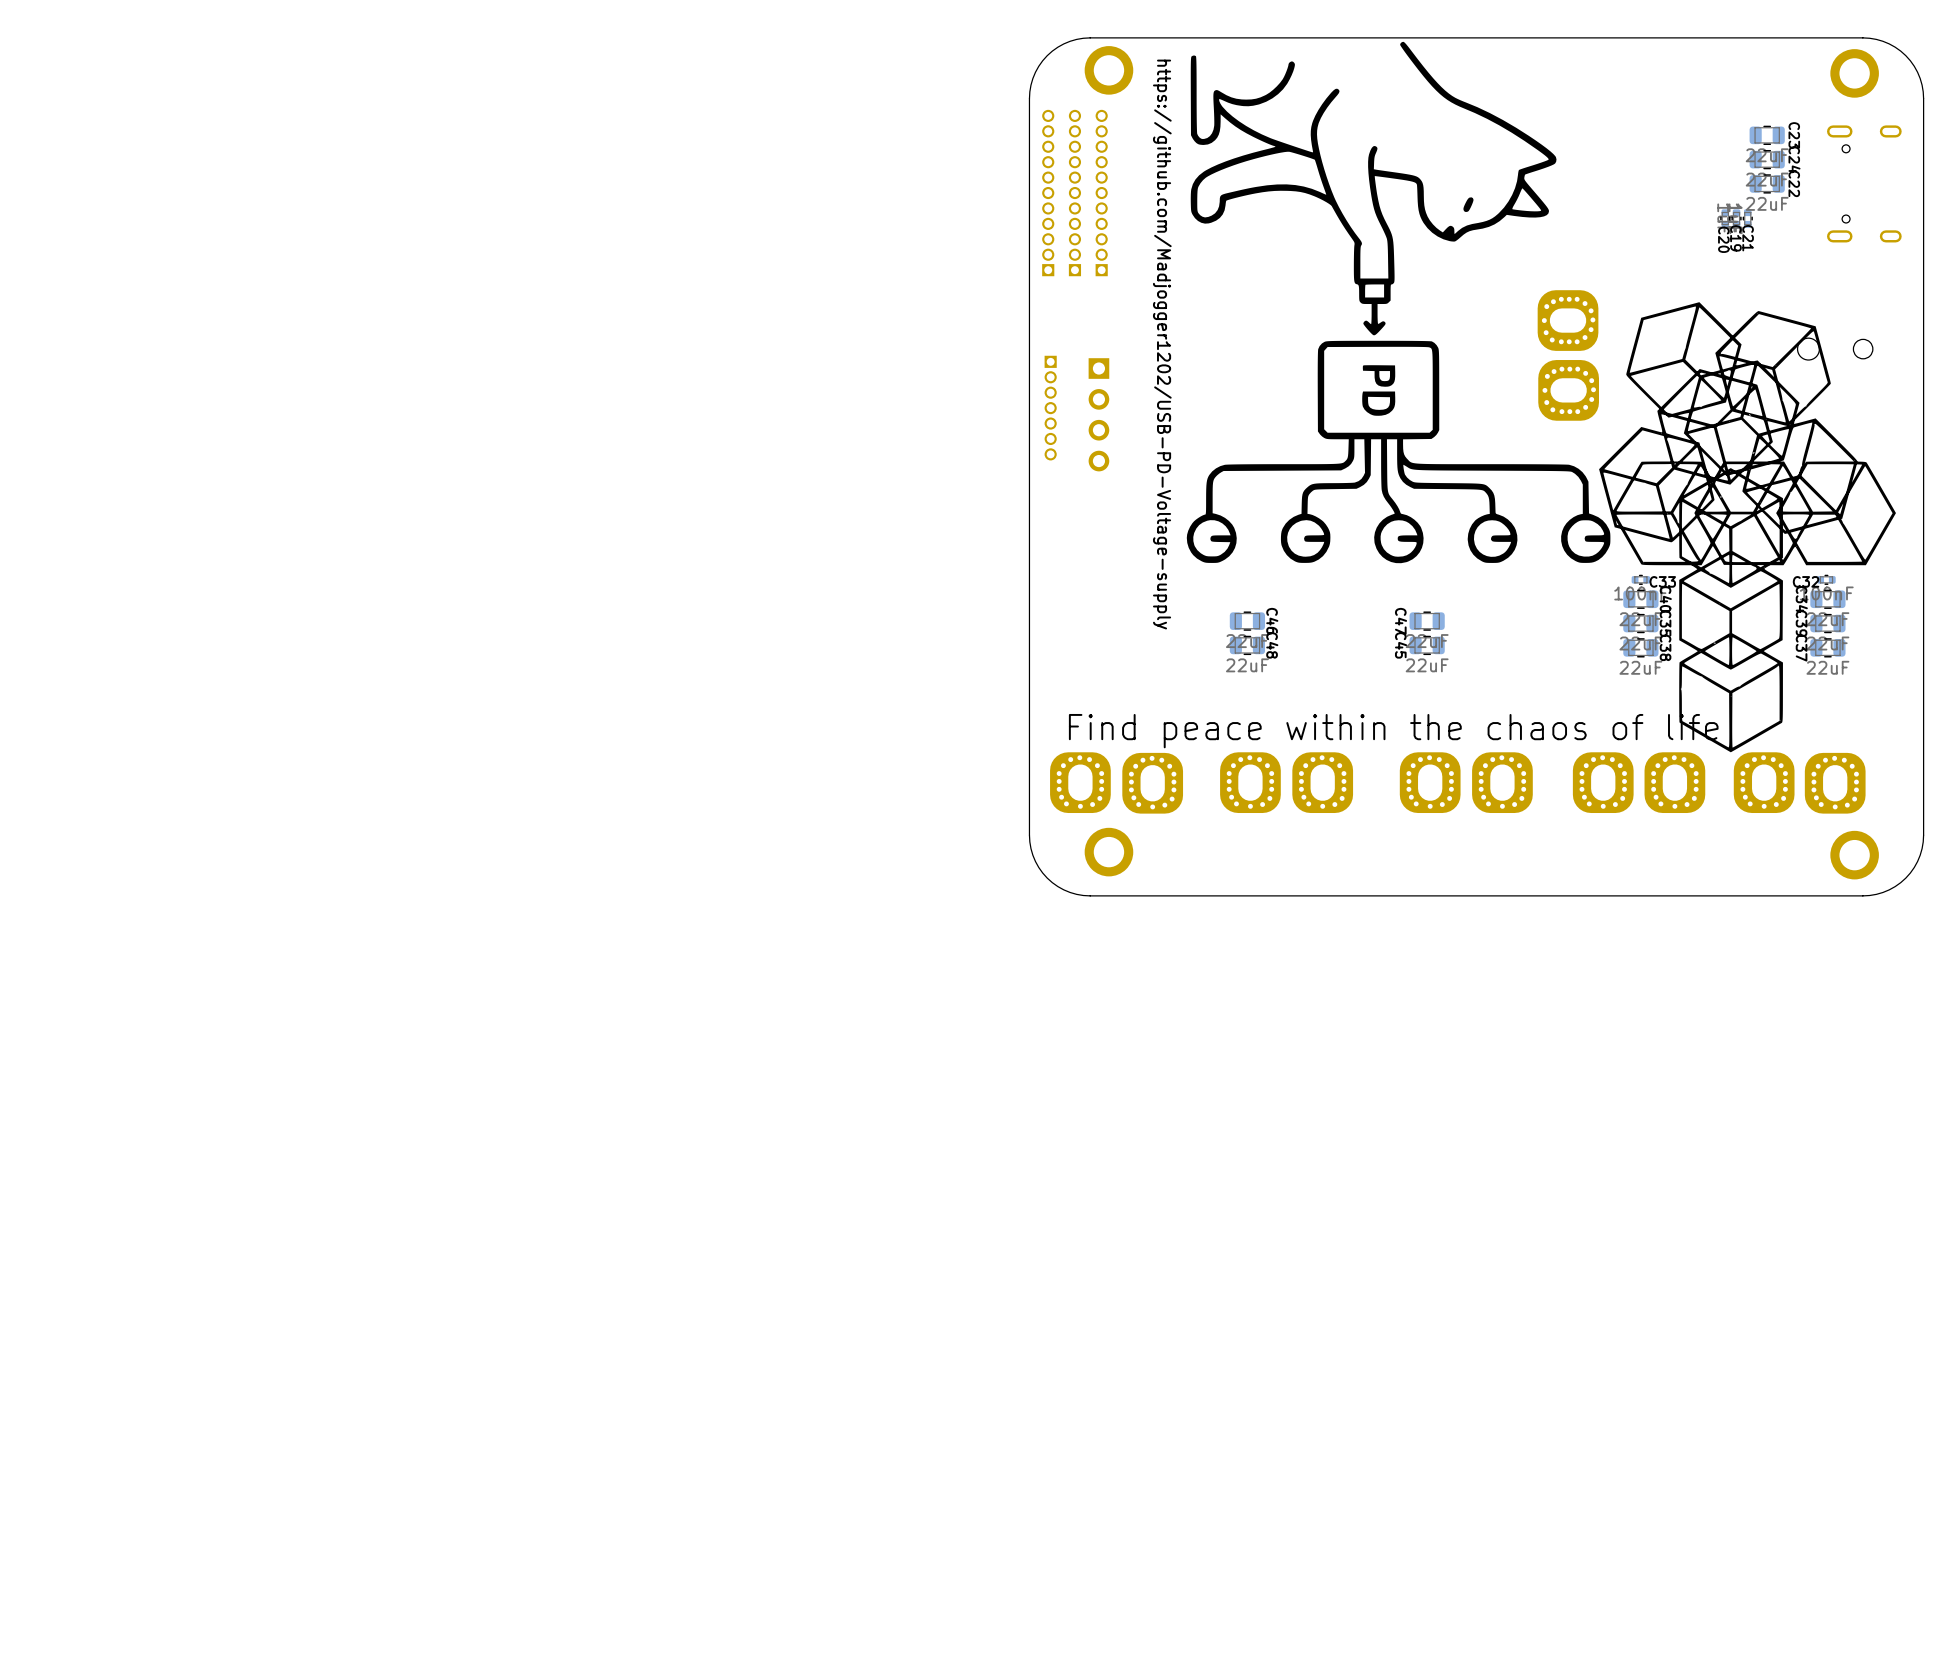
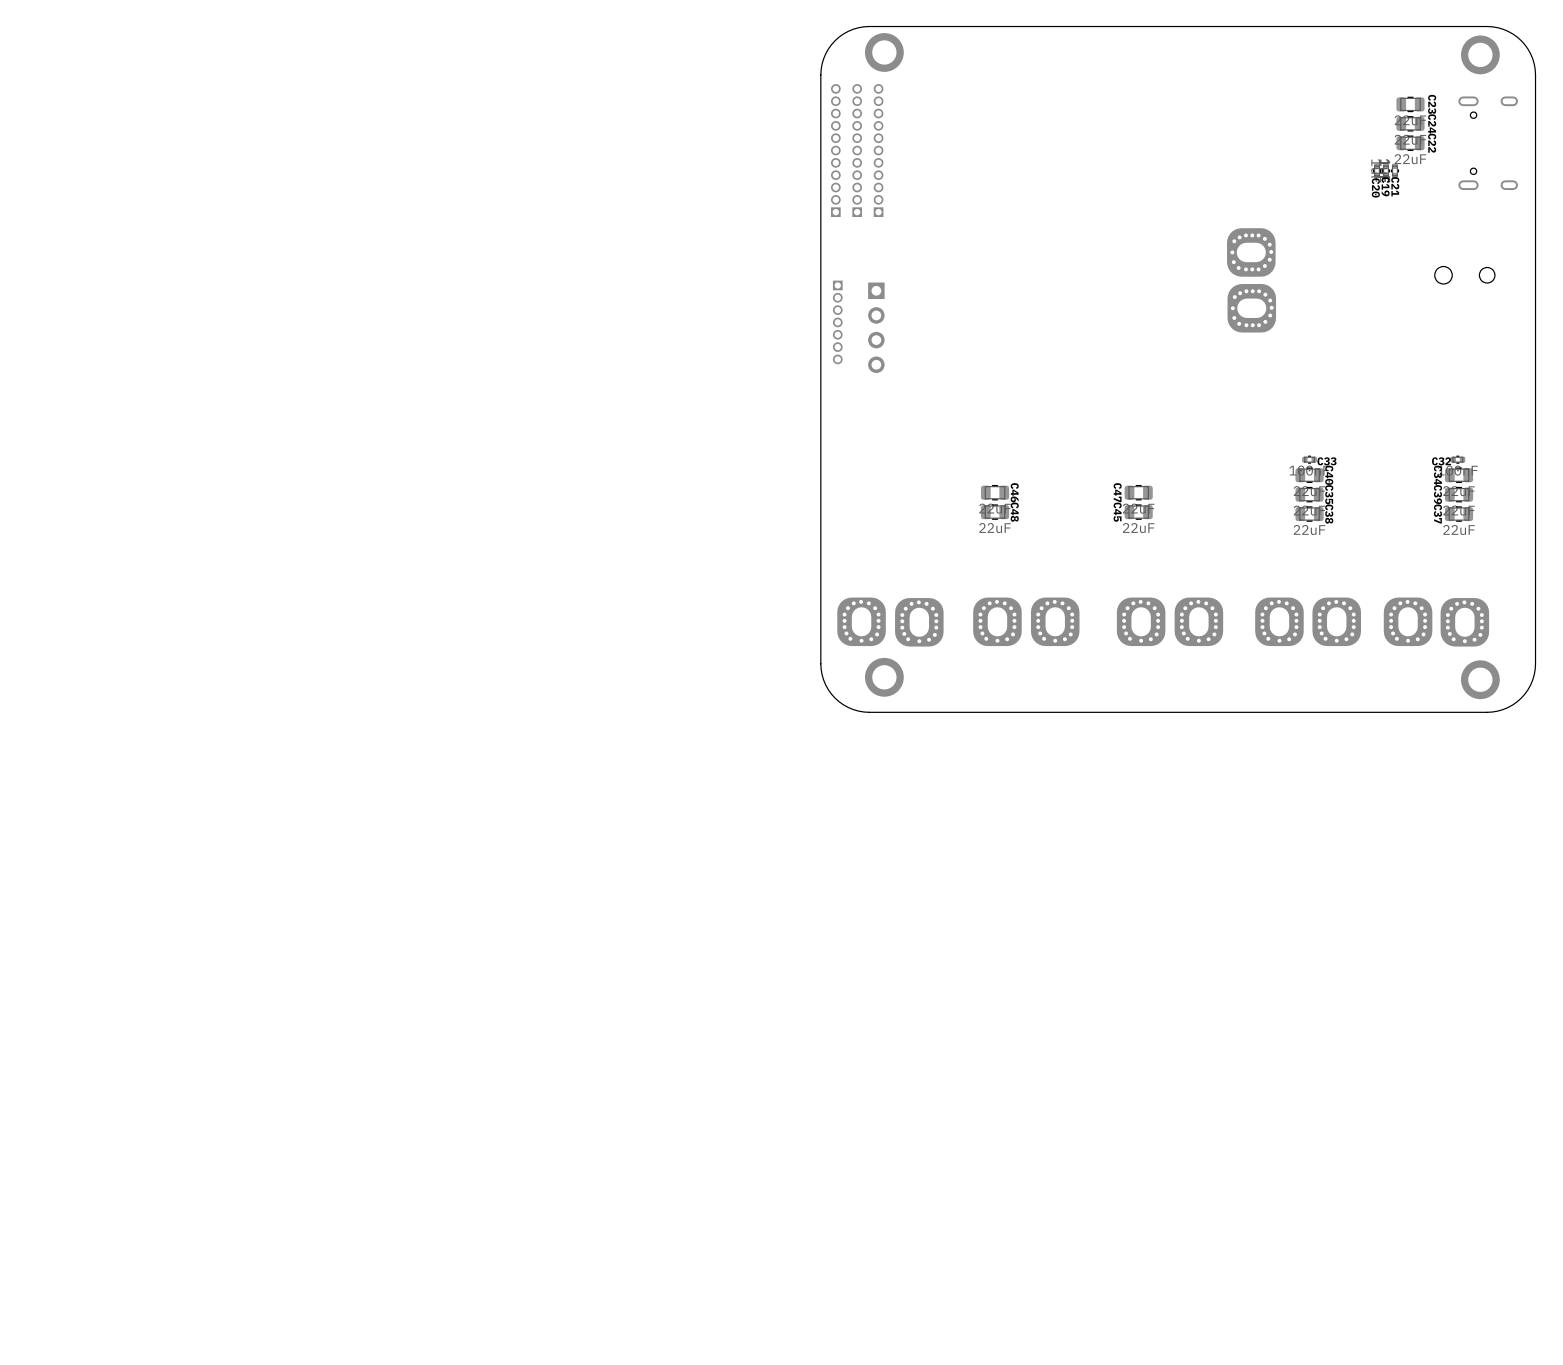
drawing: [1186, 41, 1896, 753] -> none
text: https://github.com/Madjogger1202/USB-PD-Voltage-supply (1162, 344) -> none
text: Find peace within the chaos of life (1393, 731) -> none

